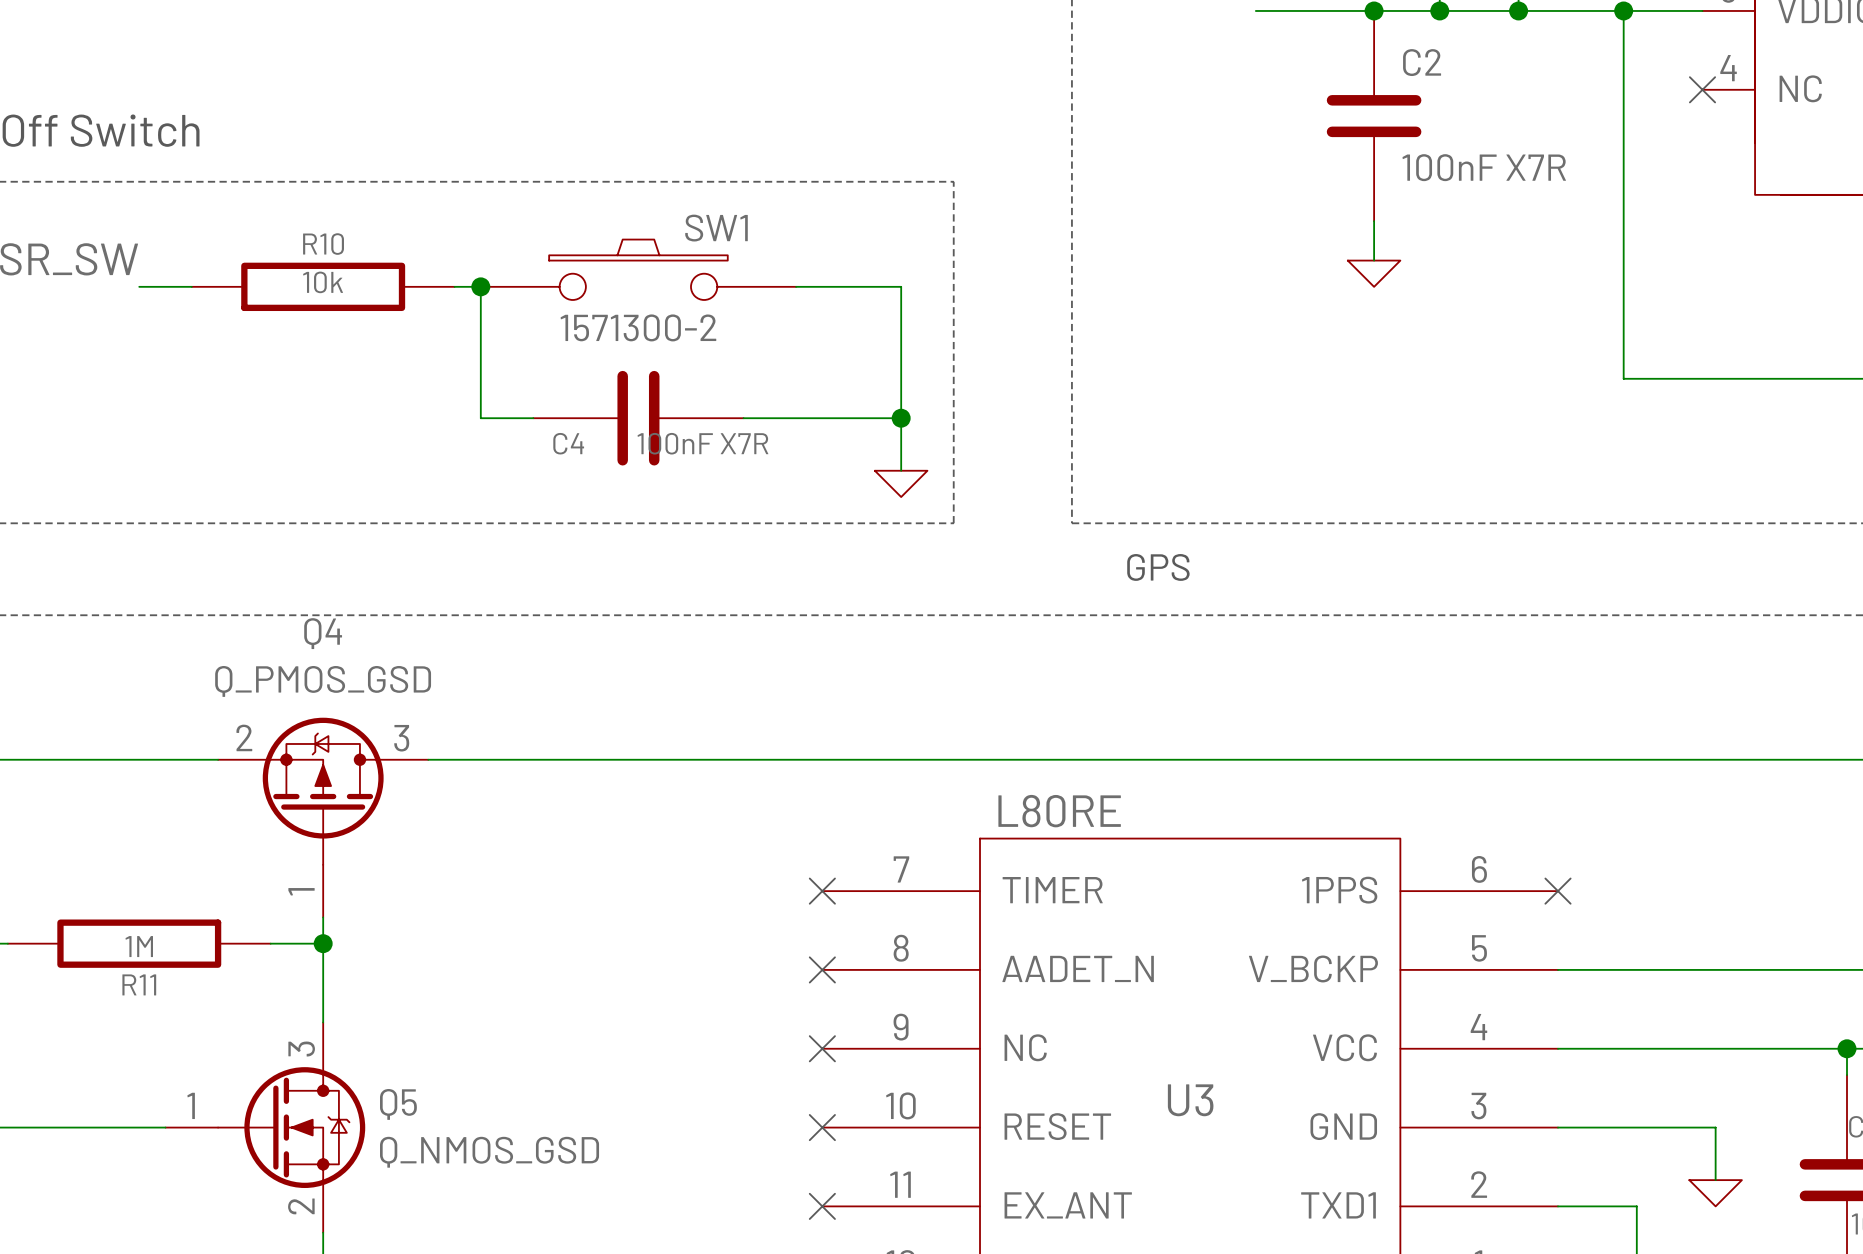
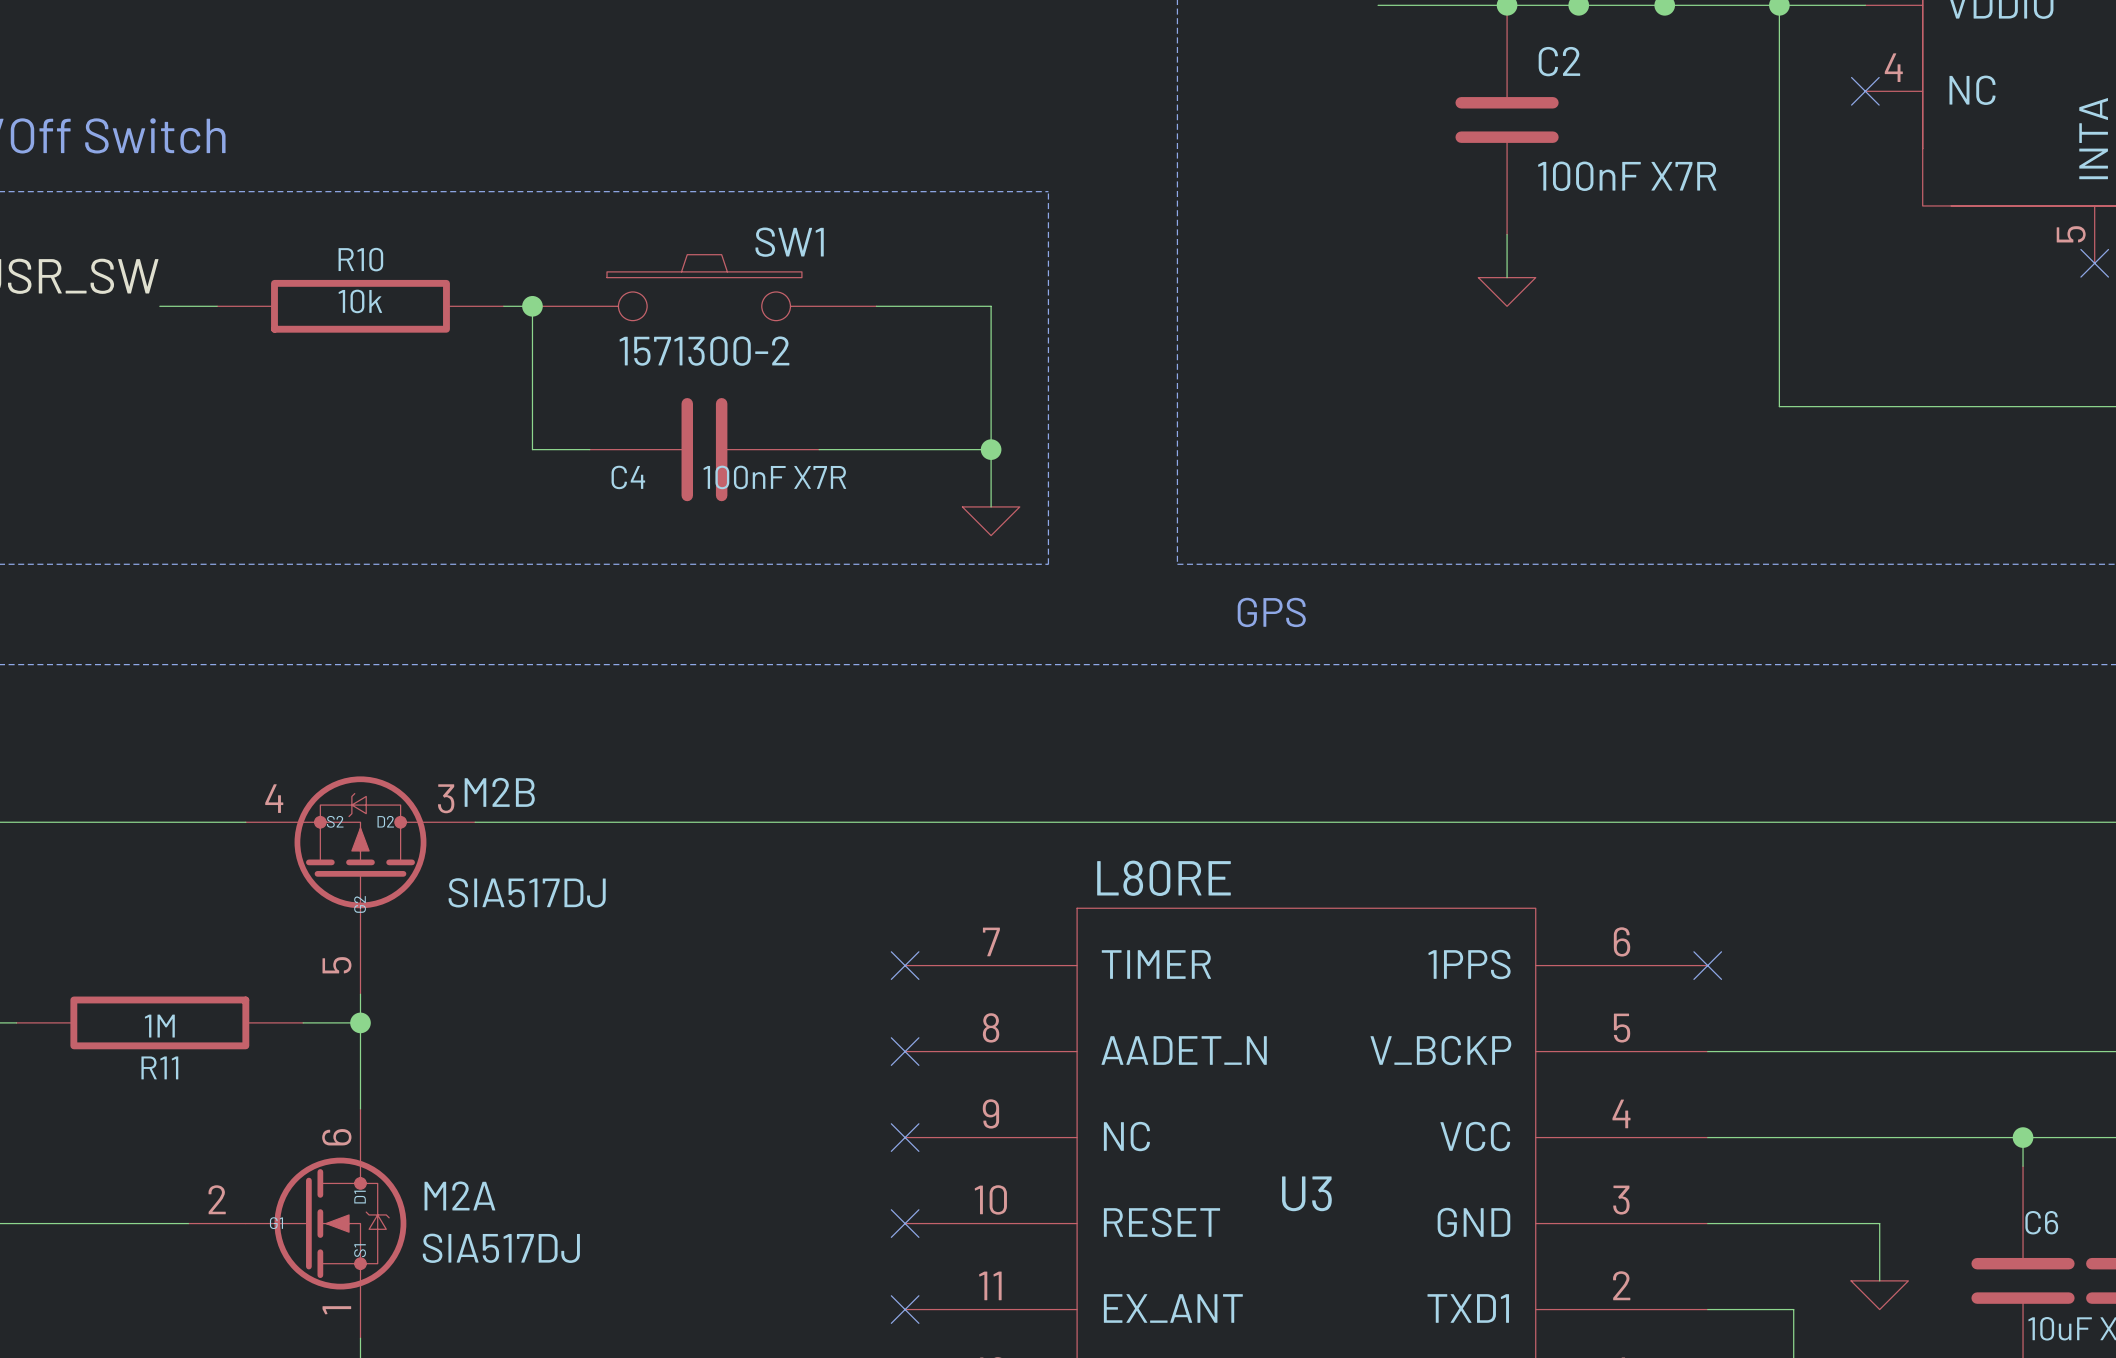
Q4 name: Q4 (323, 633) -> M2B (499, 792)
Q4 value: Q_PMOS_GSD (323, 681) -> SIA517DJ (527, 892)
Q4 pin number: 2 (244, 737) -> 4 (274, 798)
Q4 pin name: none -> S2 (335, 821)
Q4 pin name: none -> D2 (385, 821)
Q4 pin name: none -> G2 (360, 904)
Q4 pin number: 1 (301, 891) -> 5 (336, 965)
Q5 pin number: 3 (301, 1049) -> 6 (336, 1137)
Q5 pin name: none -> D1 (360, 1197)
Q5 name: Q5 (398, 1104) -> M2A (459, 1195)
Q5 pin number: 1 (191, 1105) -> 2 (217, 1199)
Q5 pin name: none -> G1 (276, 1223)
Q5 pin name: none -> S1 (360, 1250)
Q5 value: Q_NMOS_GSD (489, 1152) -> SIA517DJ (501, 1248)
Q5 pin number: 2 (301, 1206) -> 1 (336, 1310)

